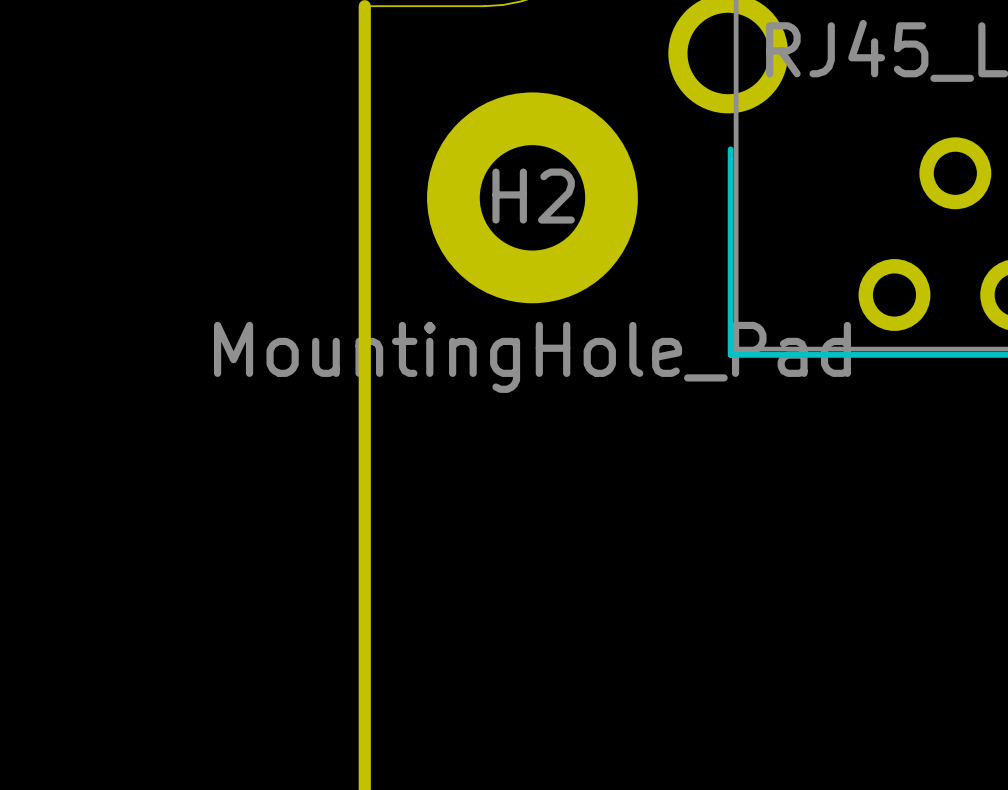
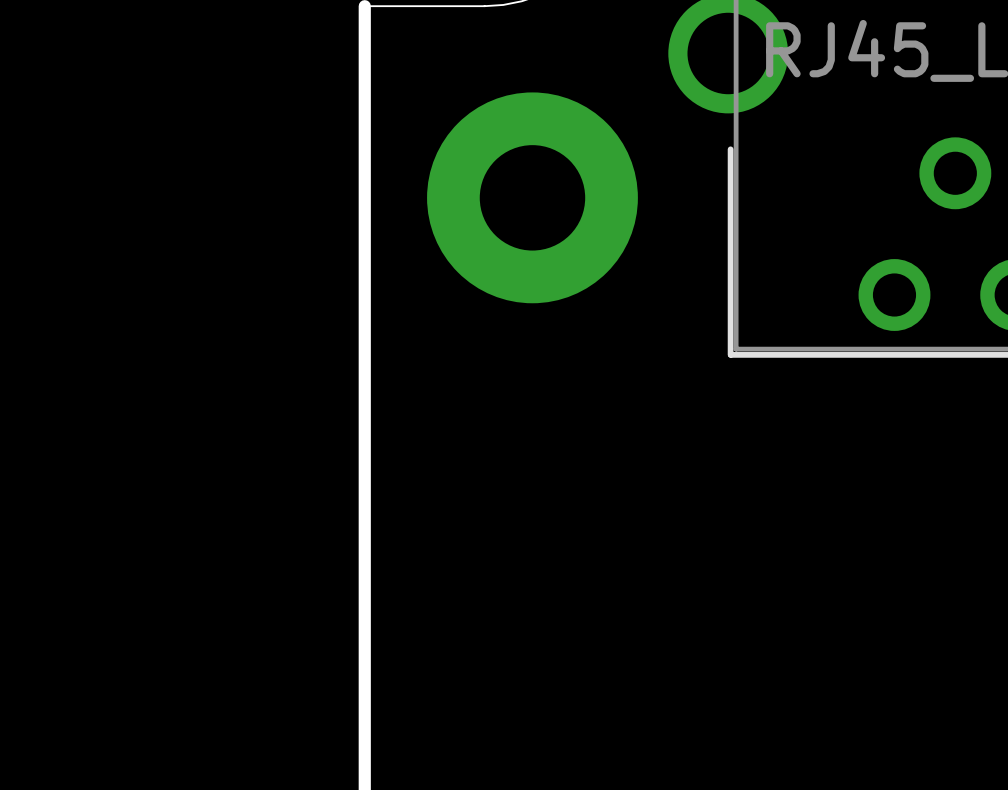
H2 name: H2 (533, 196) -> none
H2 value: MountingHole_Pad (532, 357) -> none

